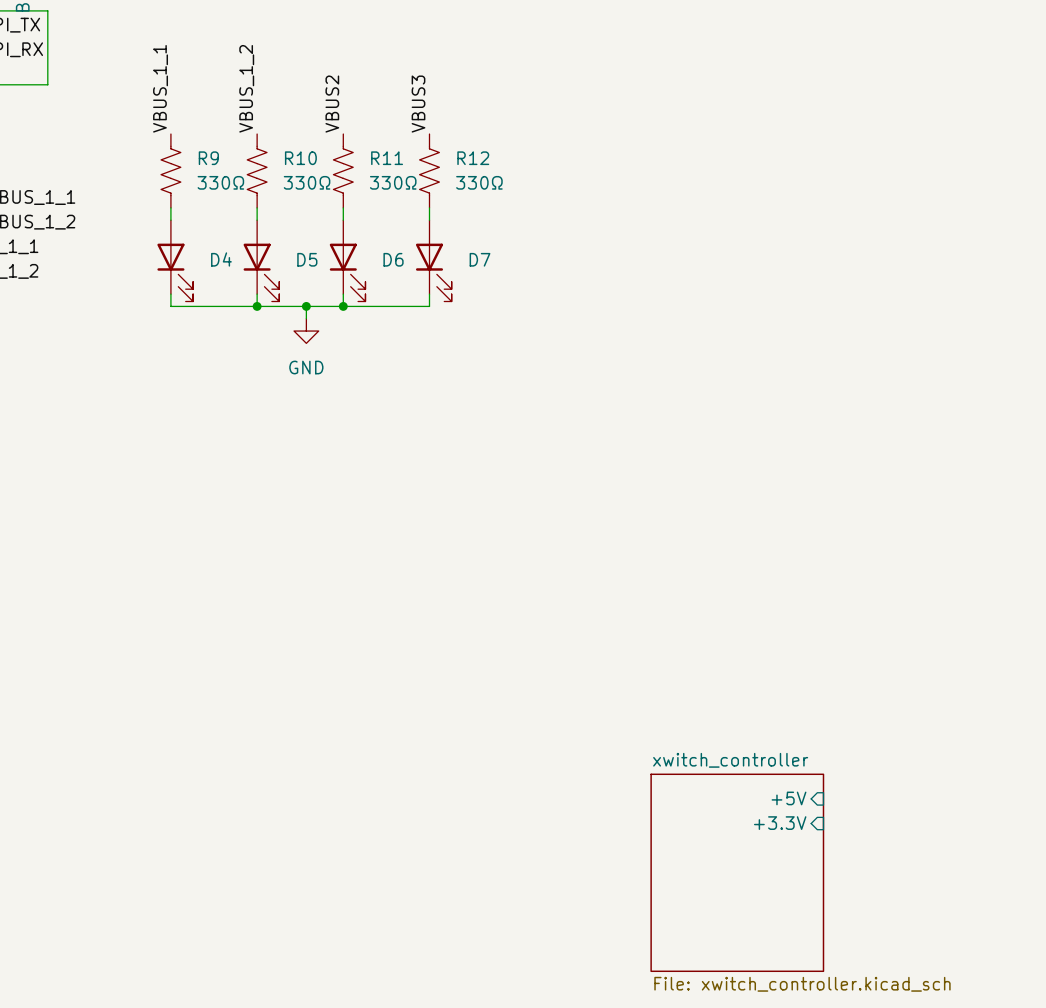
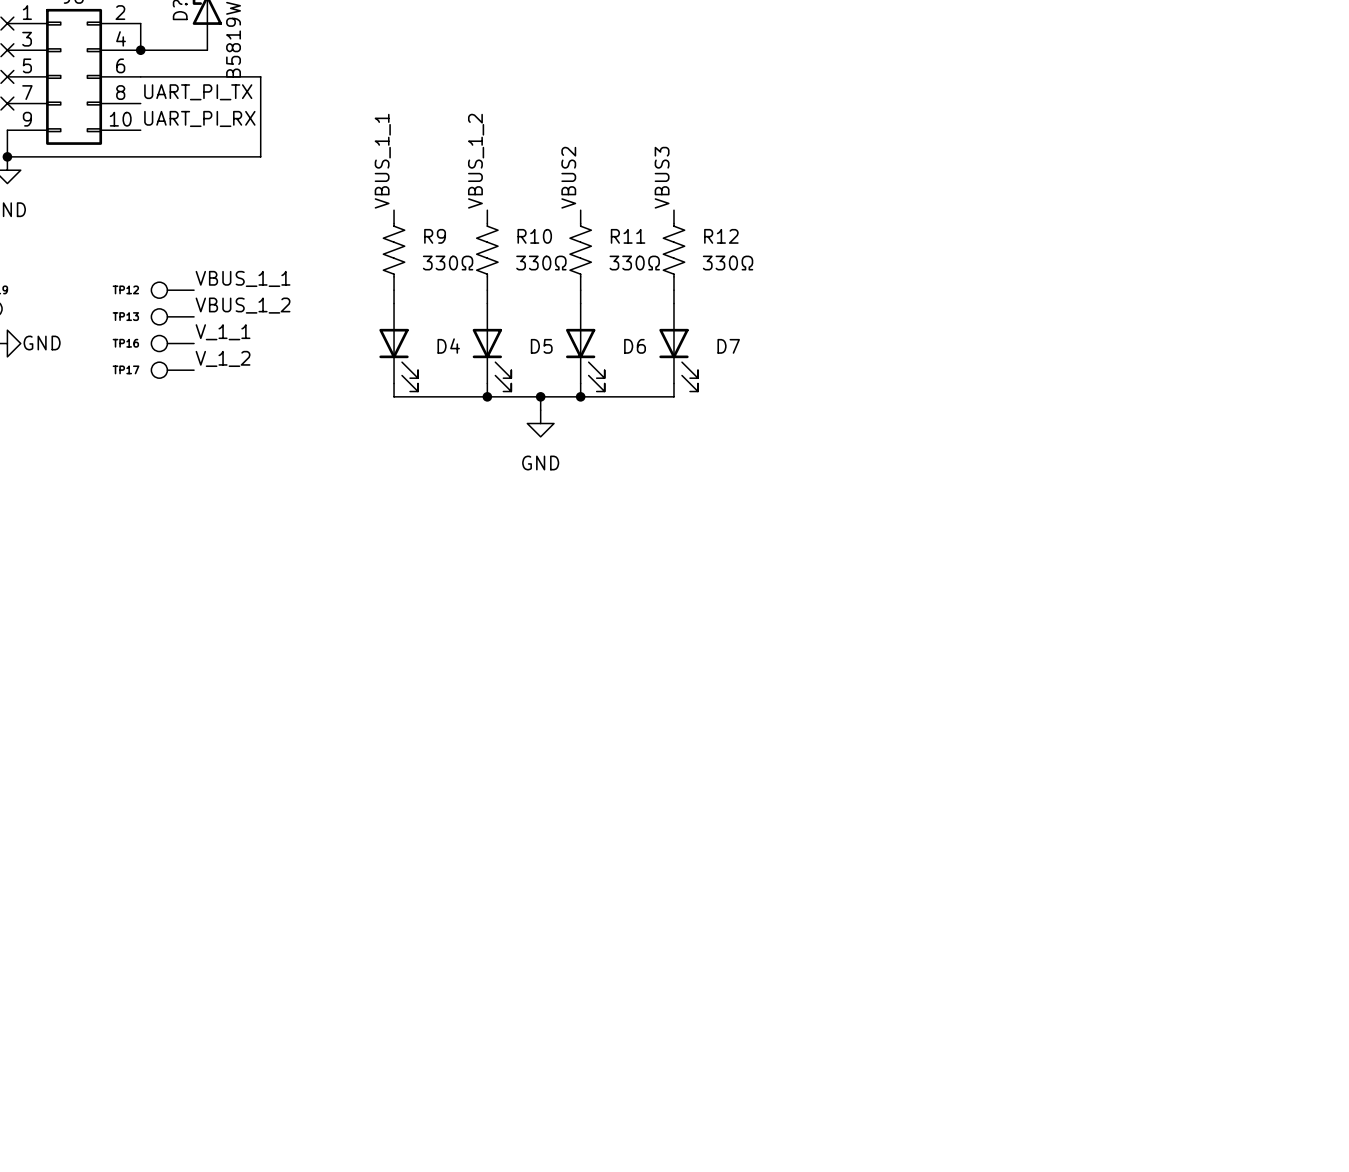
sheet pin: +5V (789, 798) -> none
sheet pin: +3.3V (780, 823) -> none
sheet xwitch_controller: File: xwitch_controller.kicad_sch (737, 872) -> none

